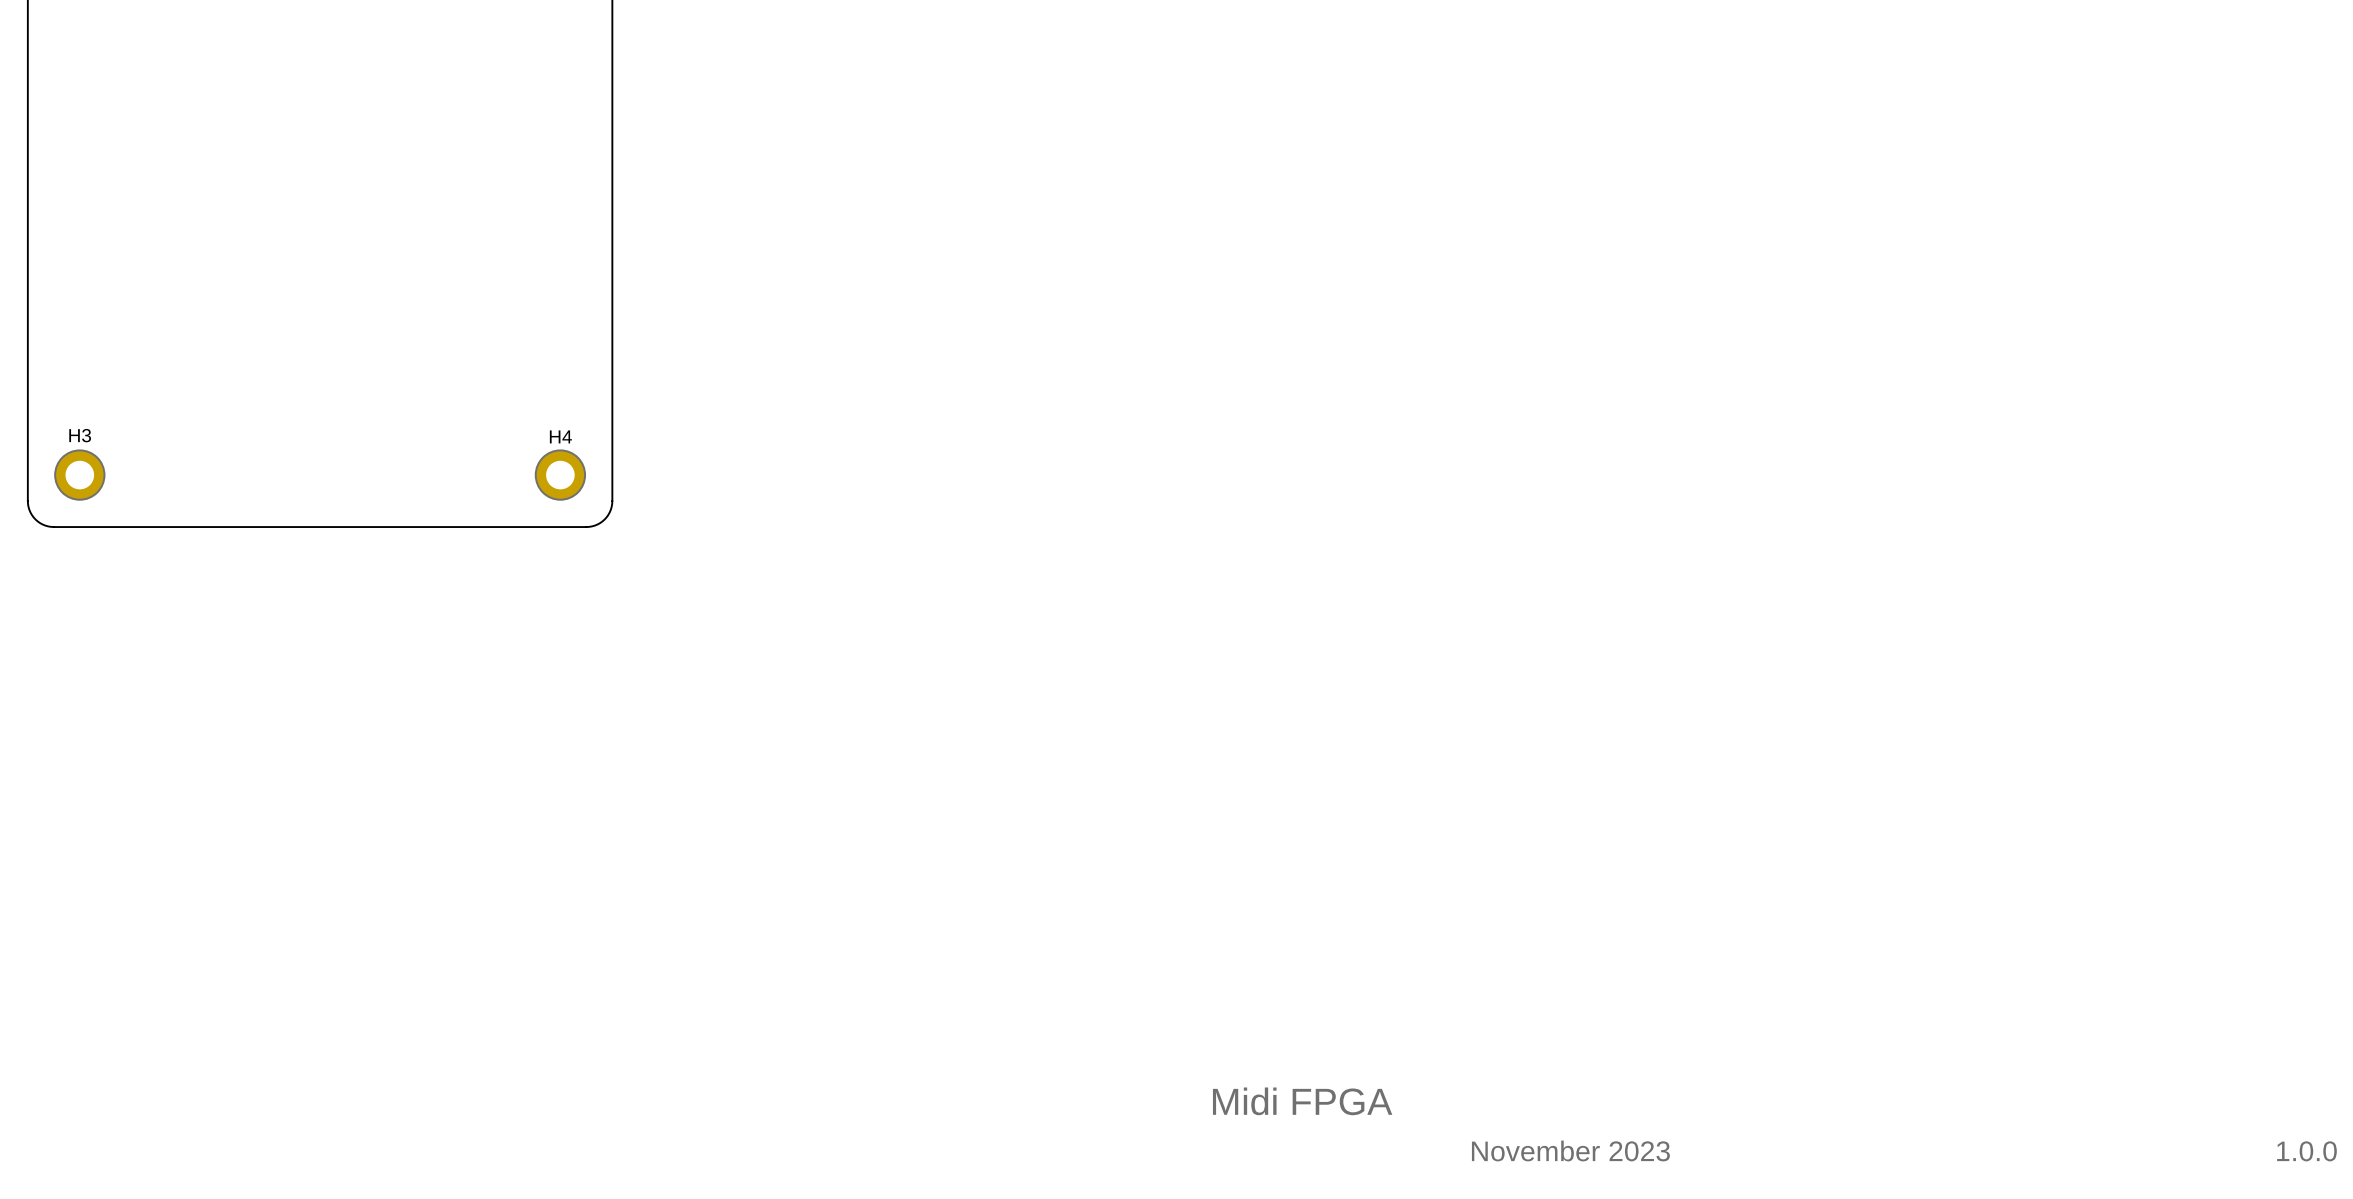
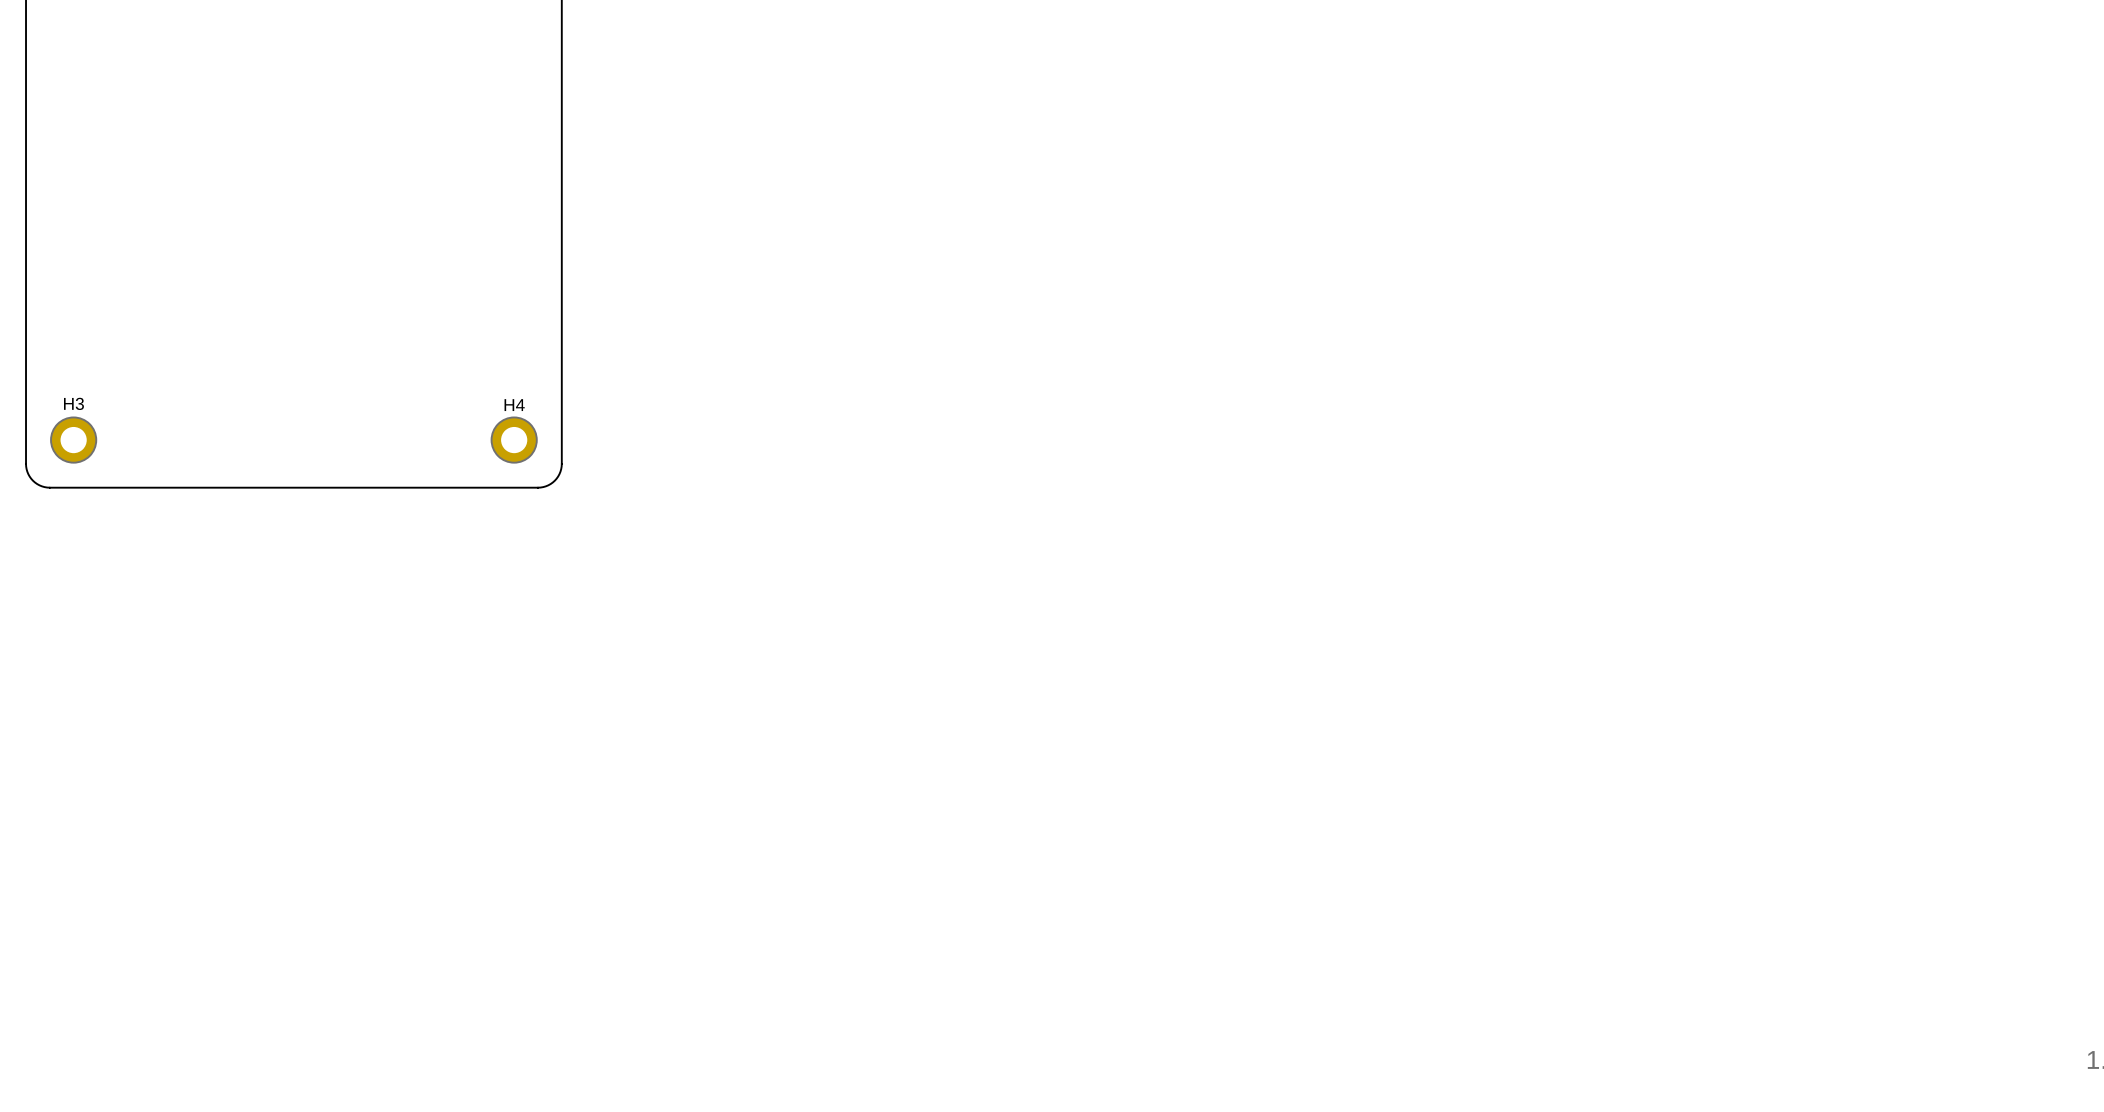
text: Midi FPGA (1302, 1101) -> none
text: November 2023 (1570, 1150) -> none

